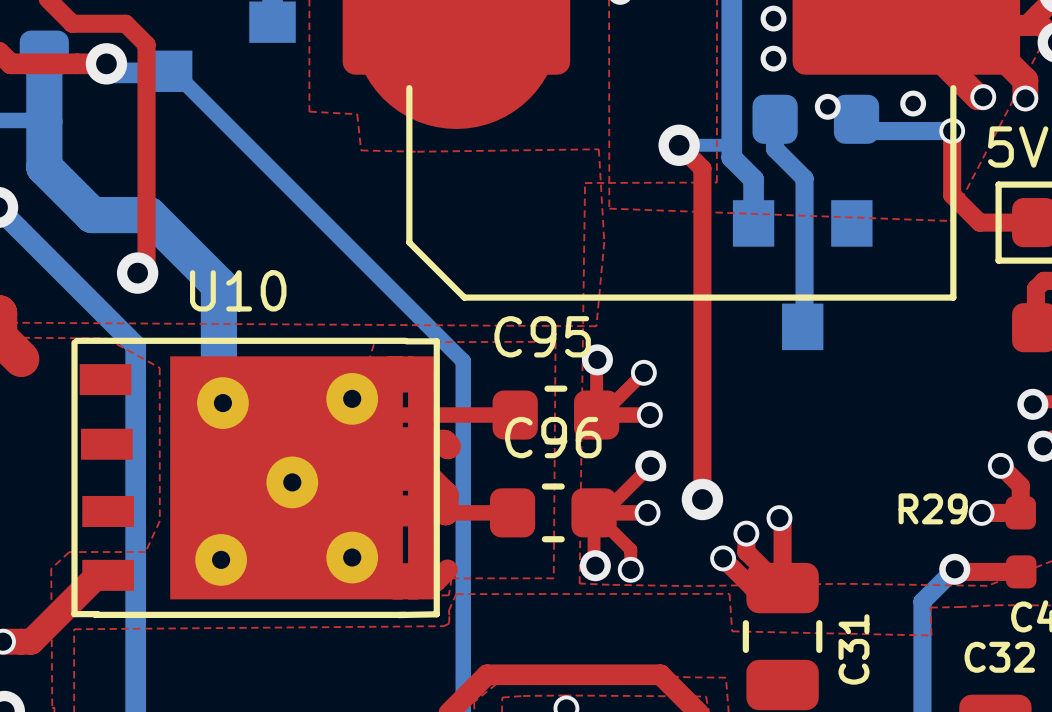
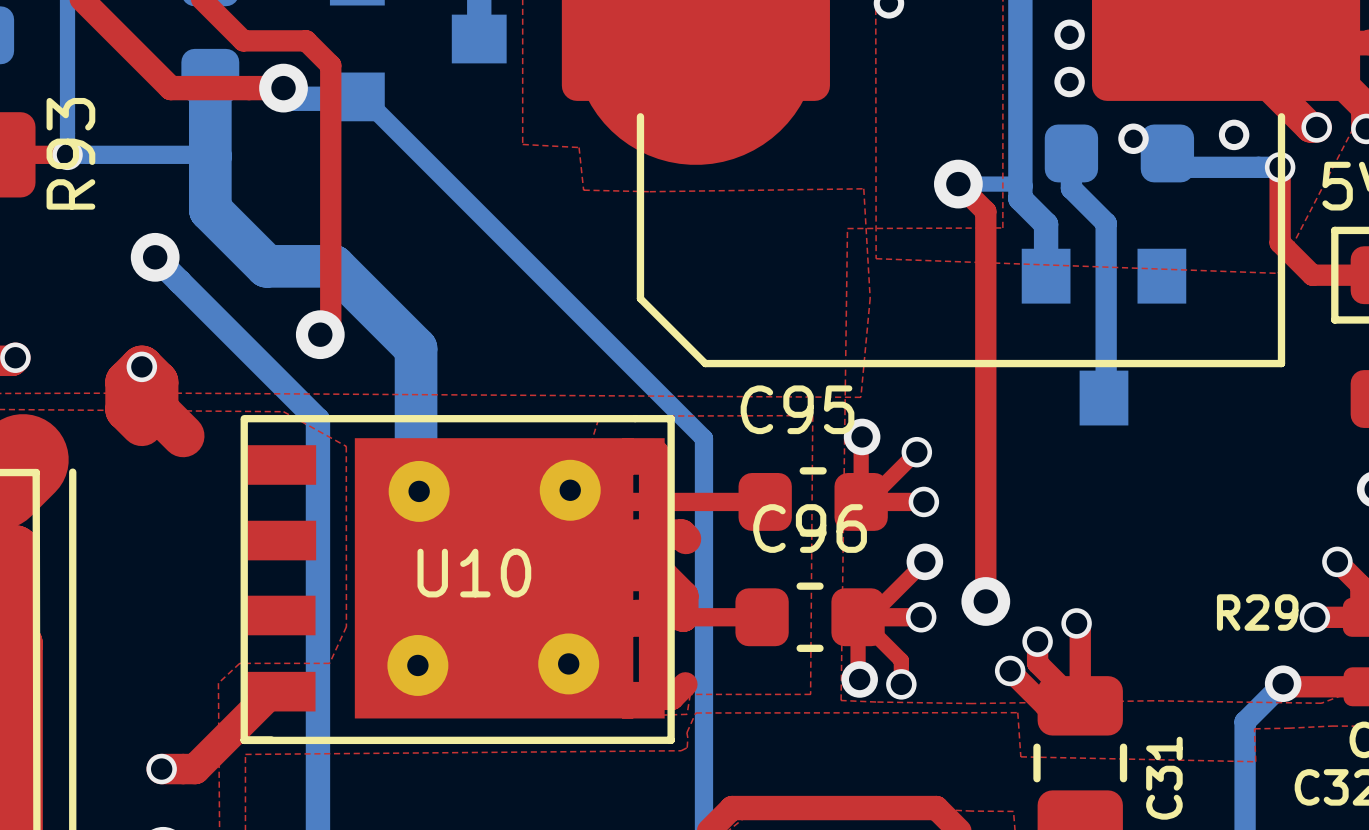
U10 name position: U10 (238, 290) -> U10 (474, 573)
U10 footprint: [71, 337, 440, 619] -> [240, 415, 675, 745]

